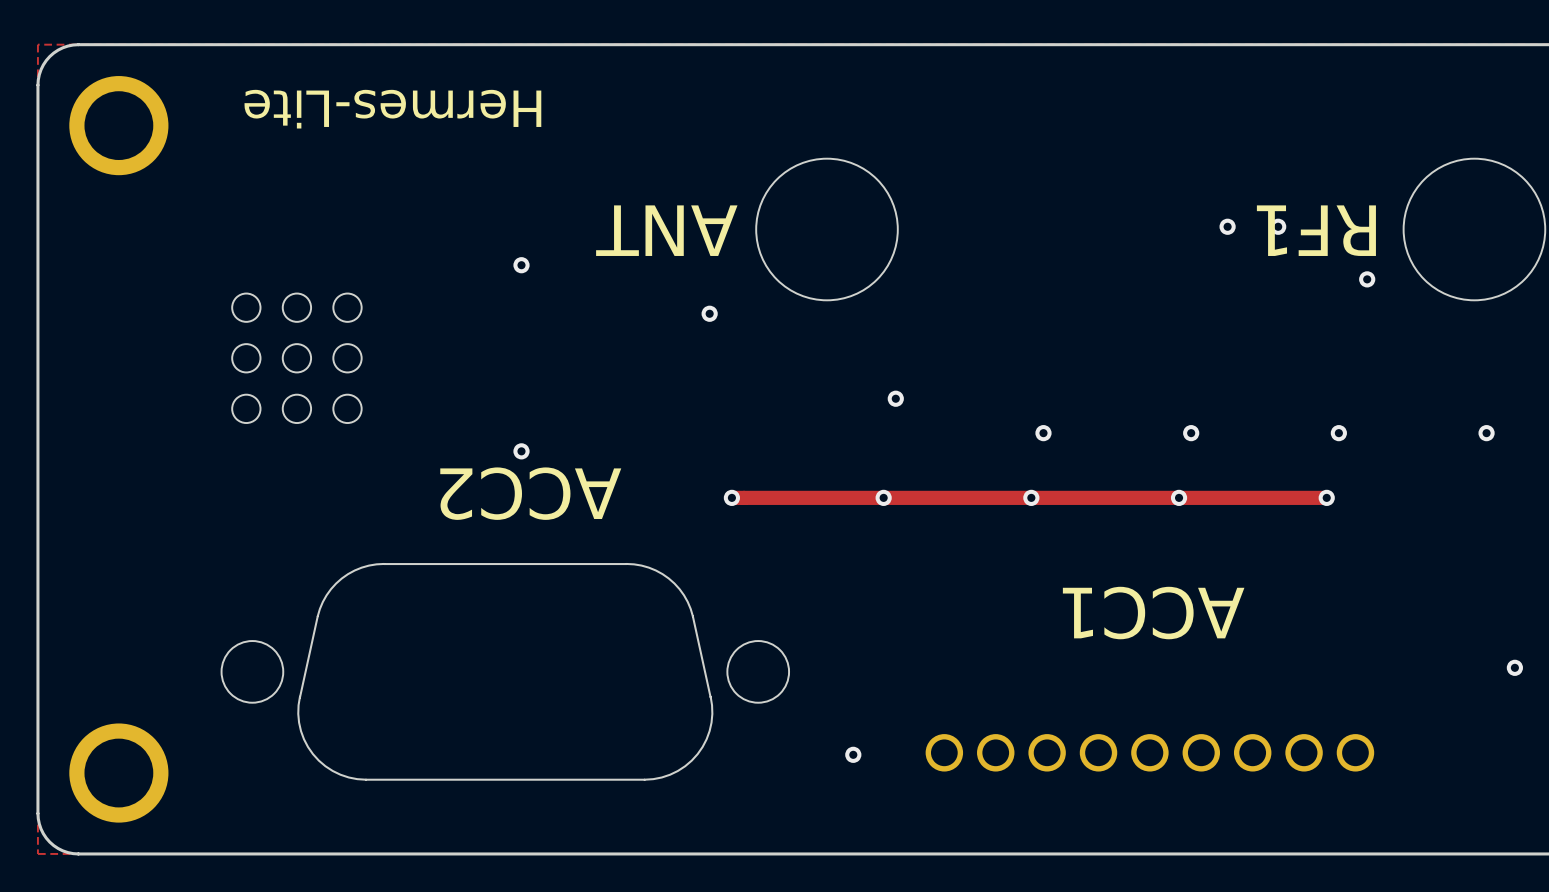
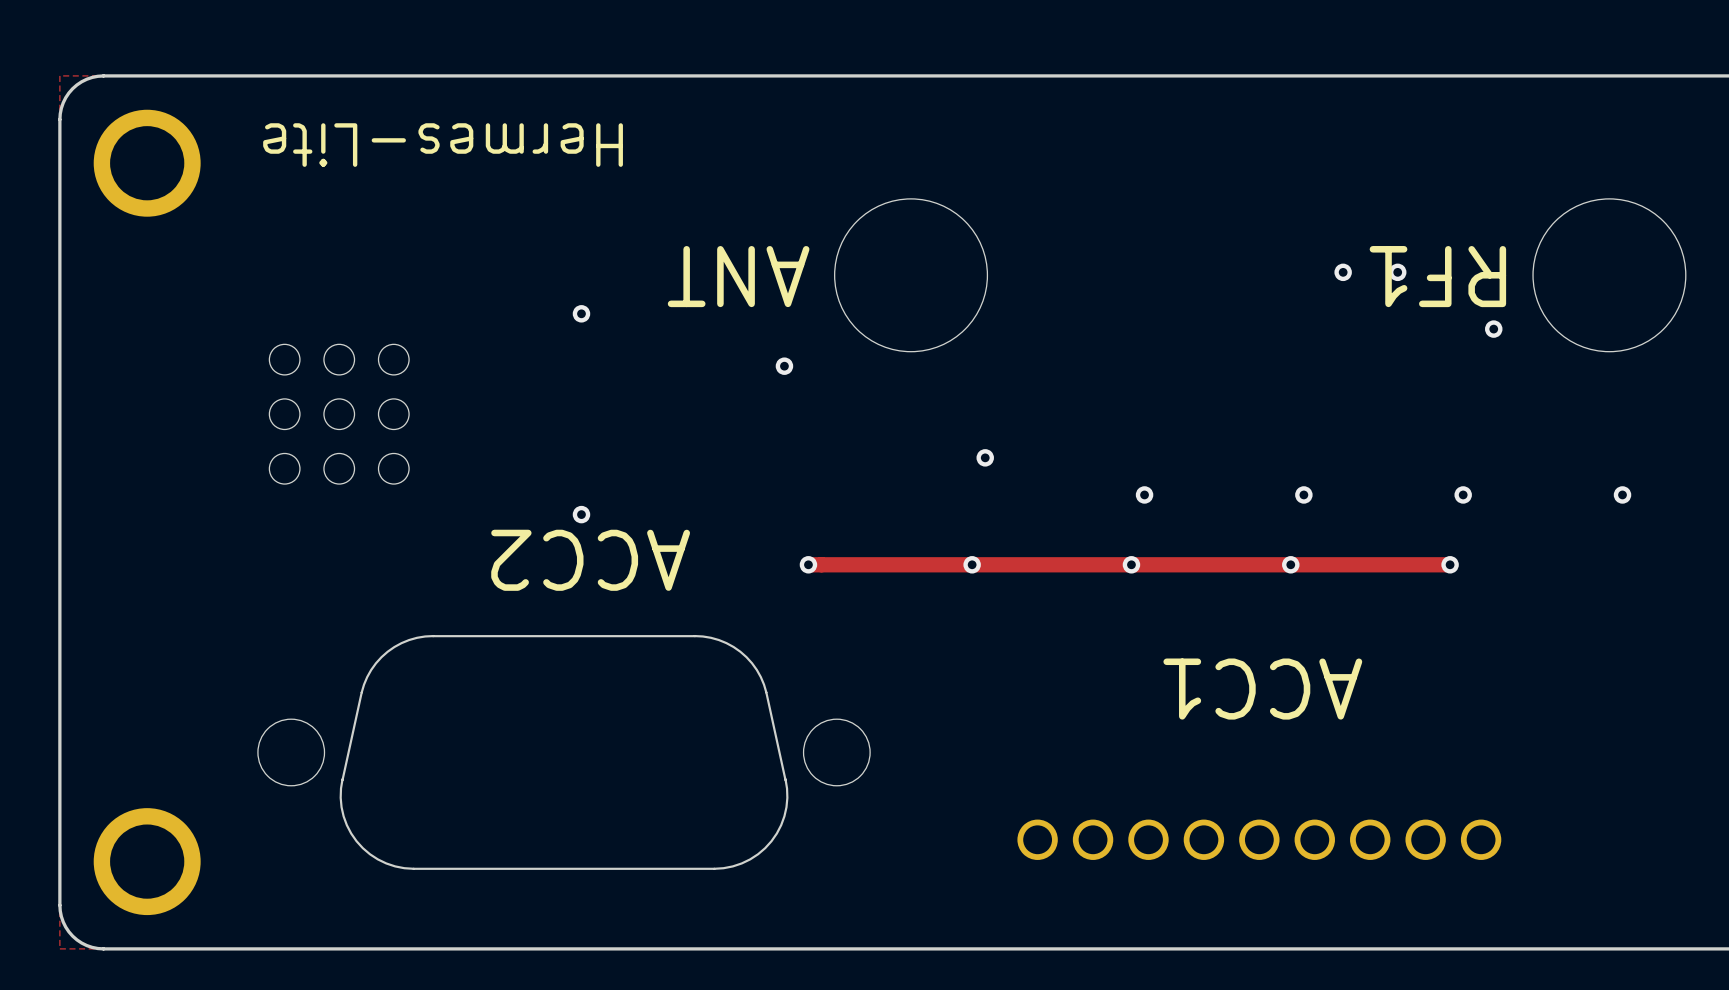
via: (1514, 667) -> none
via: (853, 754) -> none

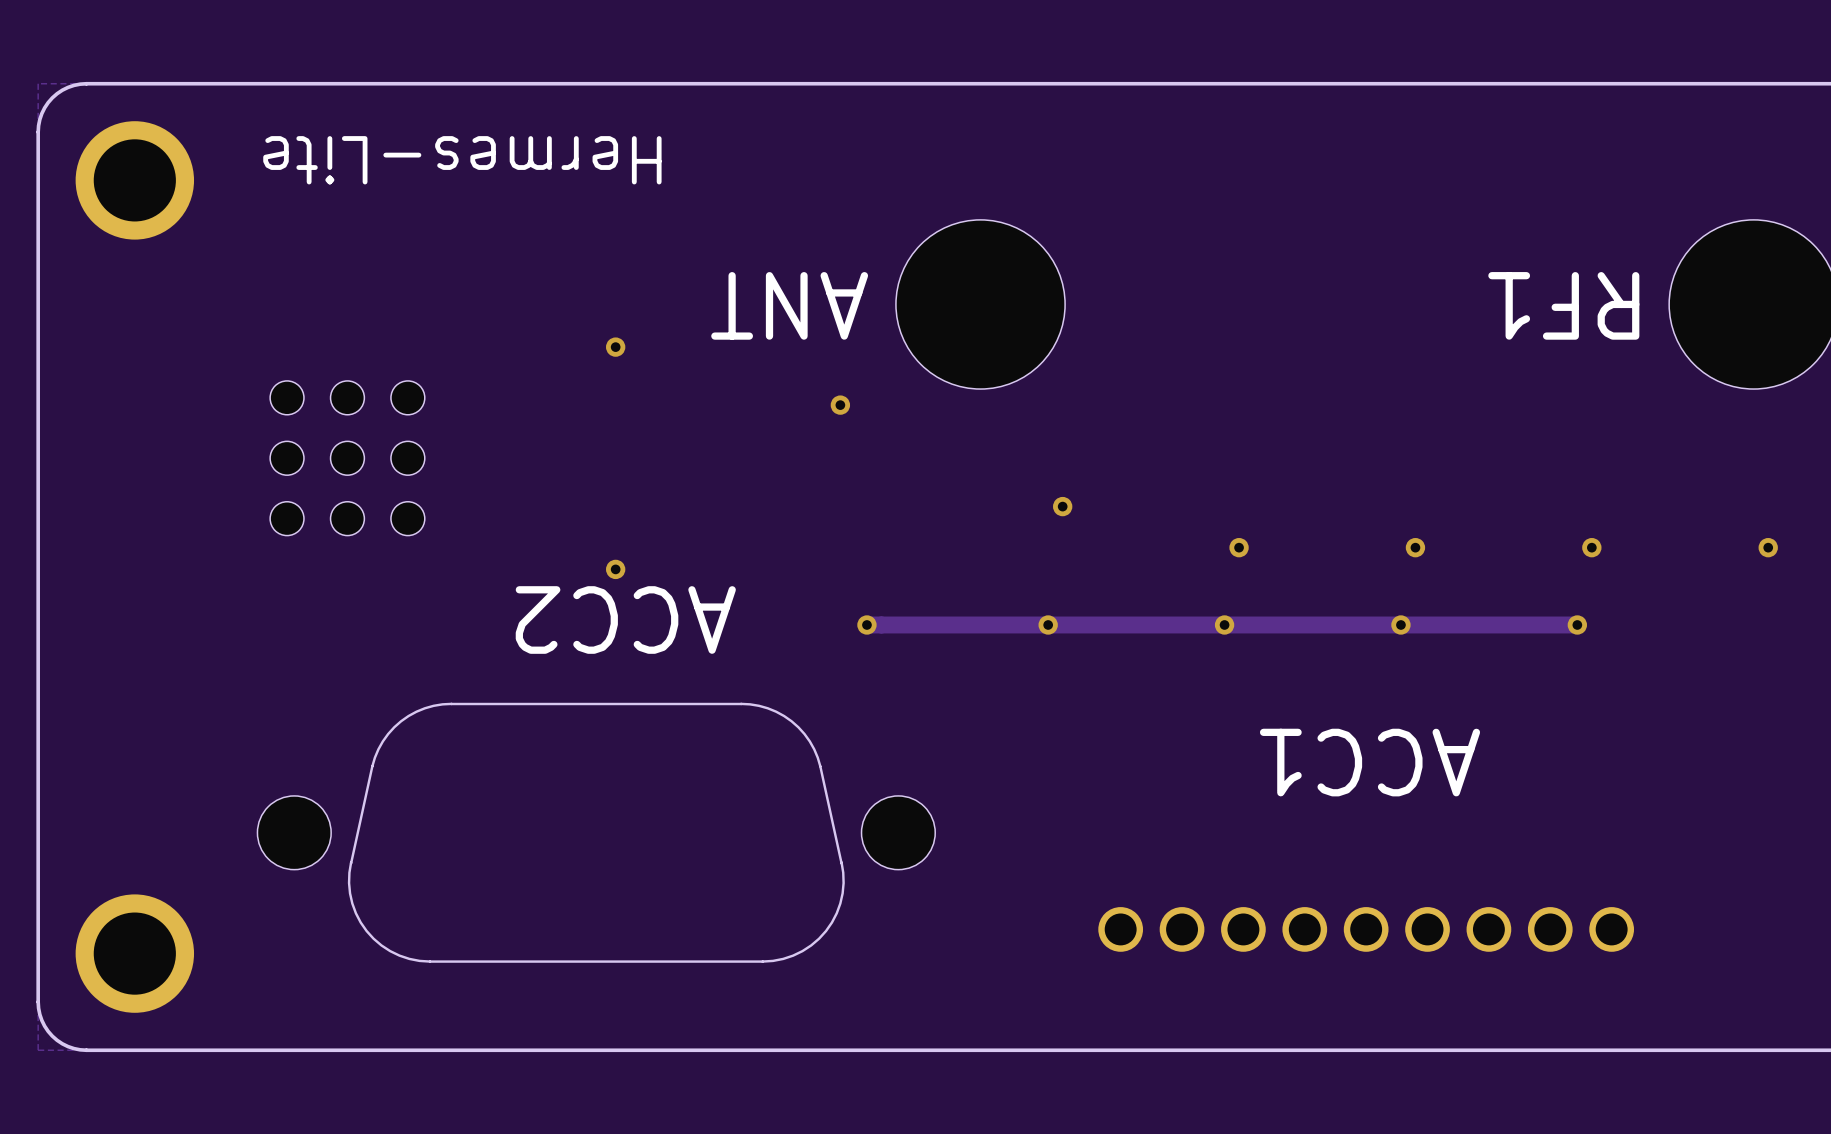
via: (1343, 272) -> none
via: (1397, 272) -> none
via: (1493, 329) -> none

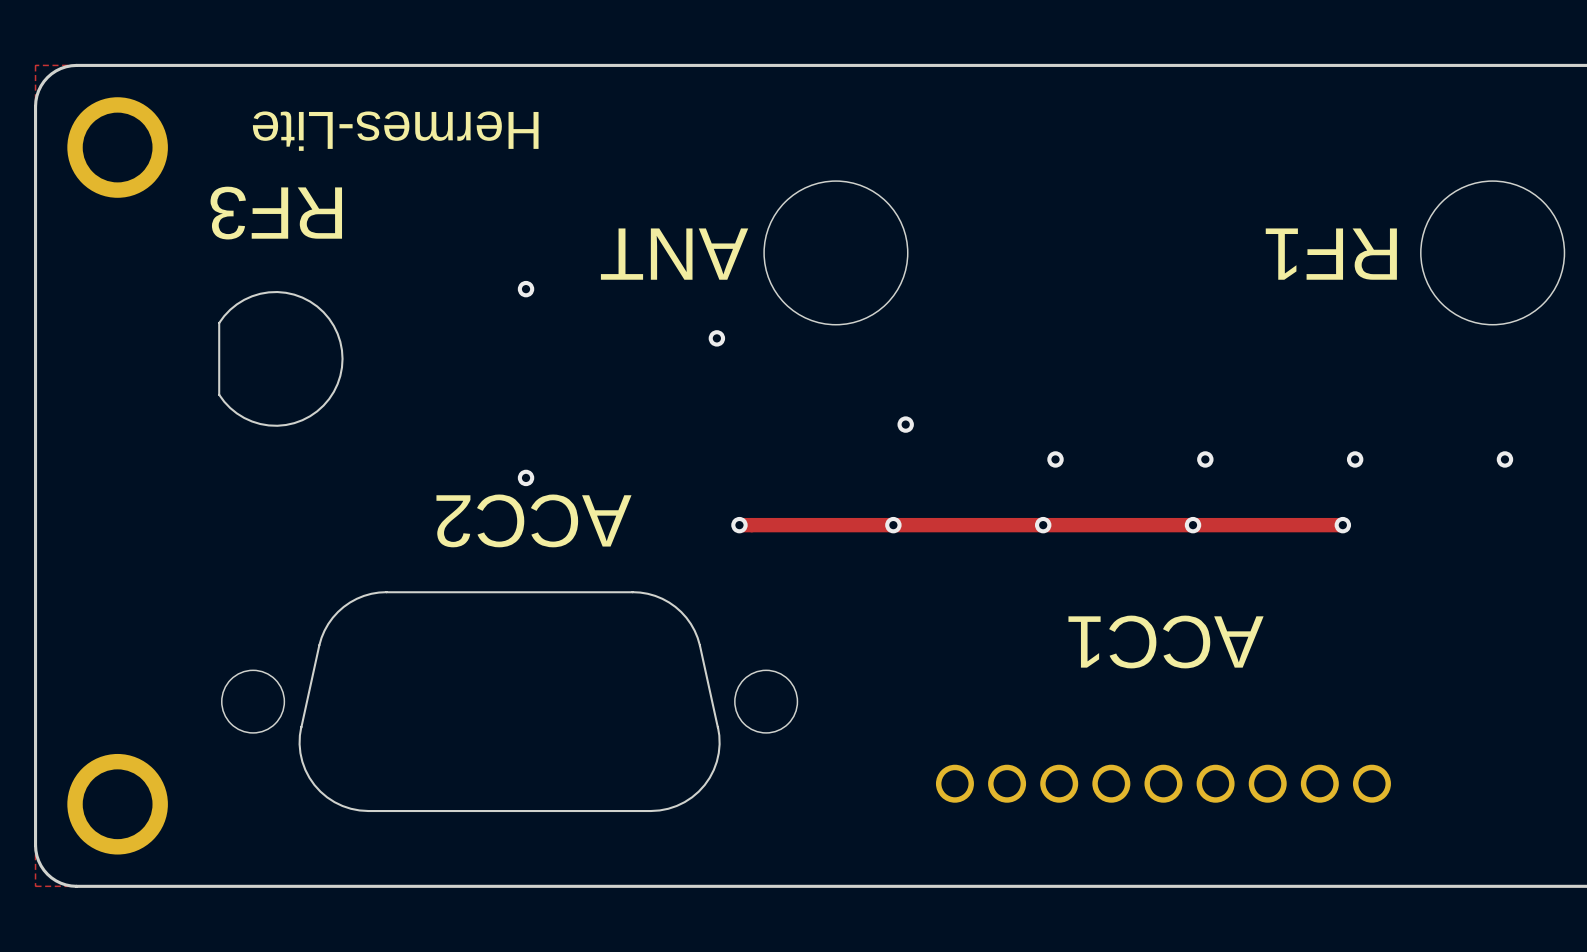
text: none -> RF3 (276, 213)
drawing: none -> [218, 291, 344, 427]
part: (347, 458) -> none

